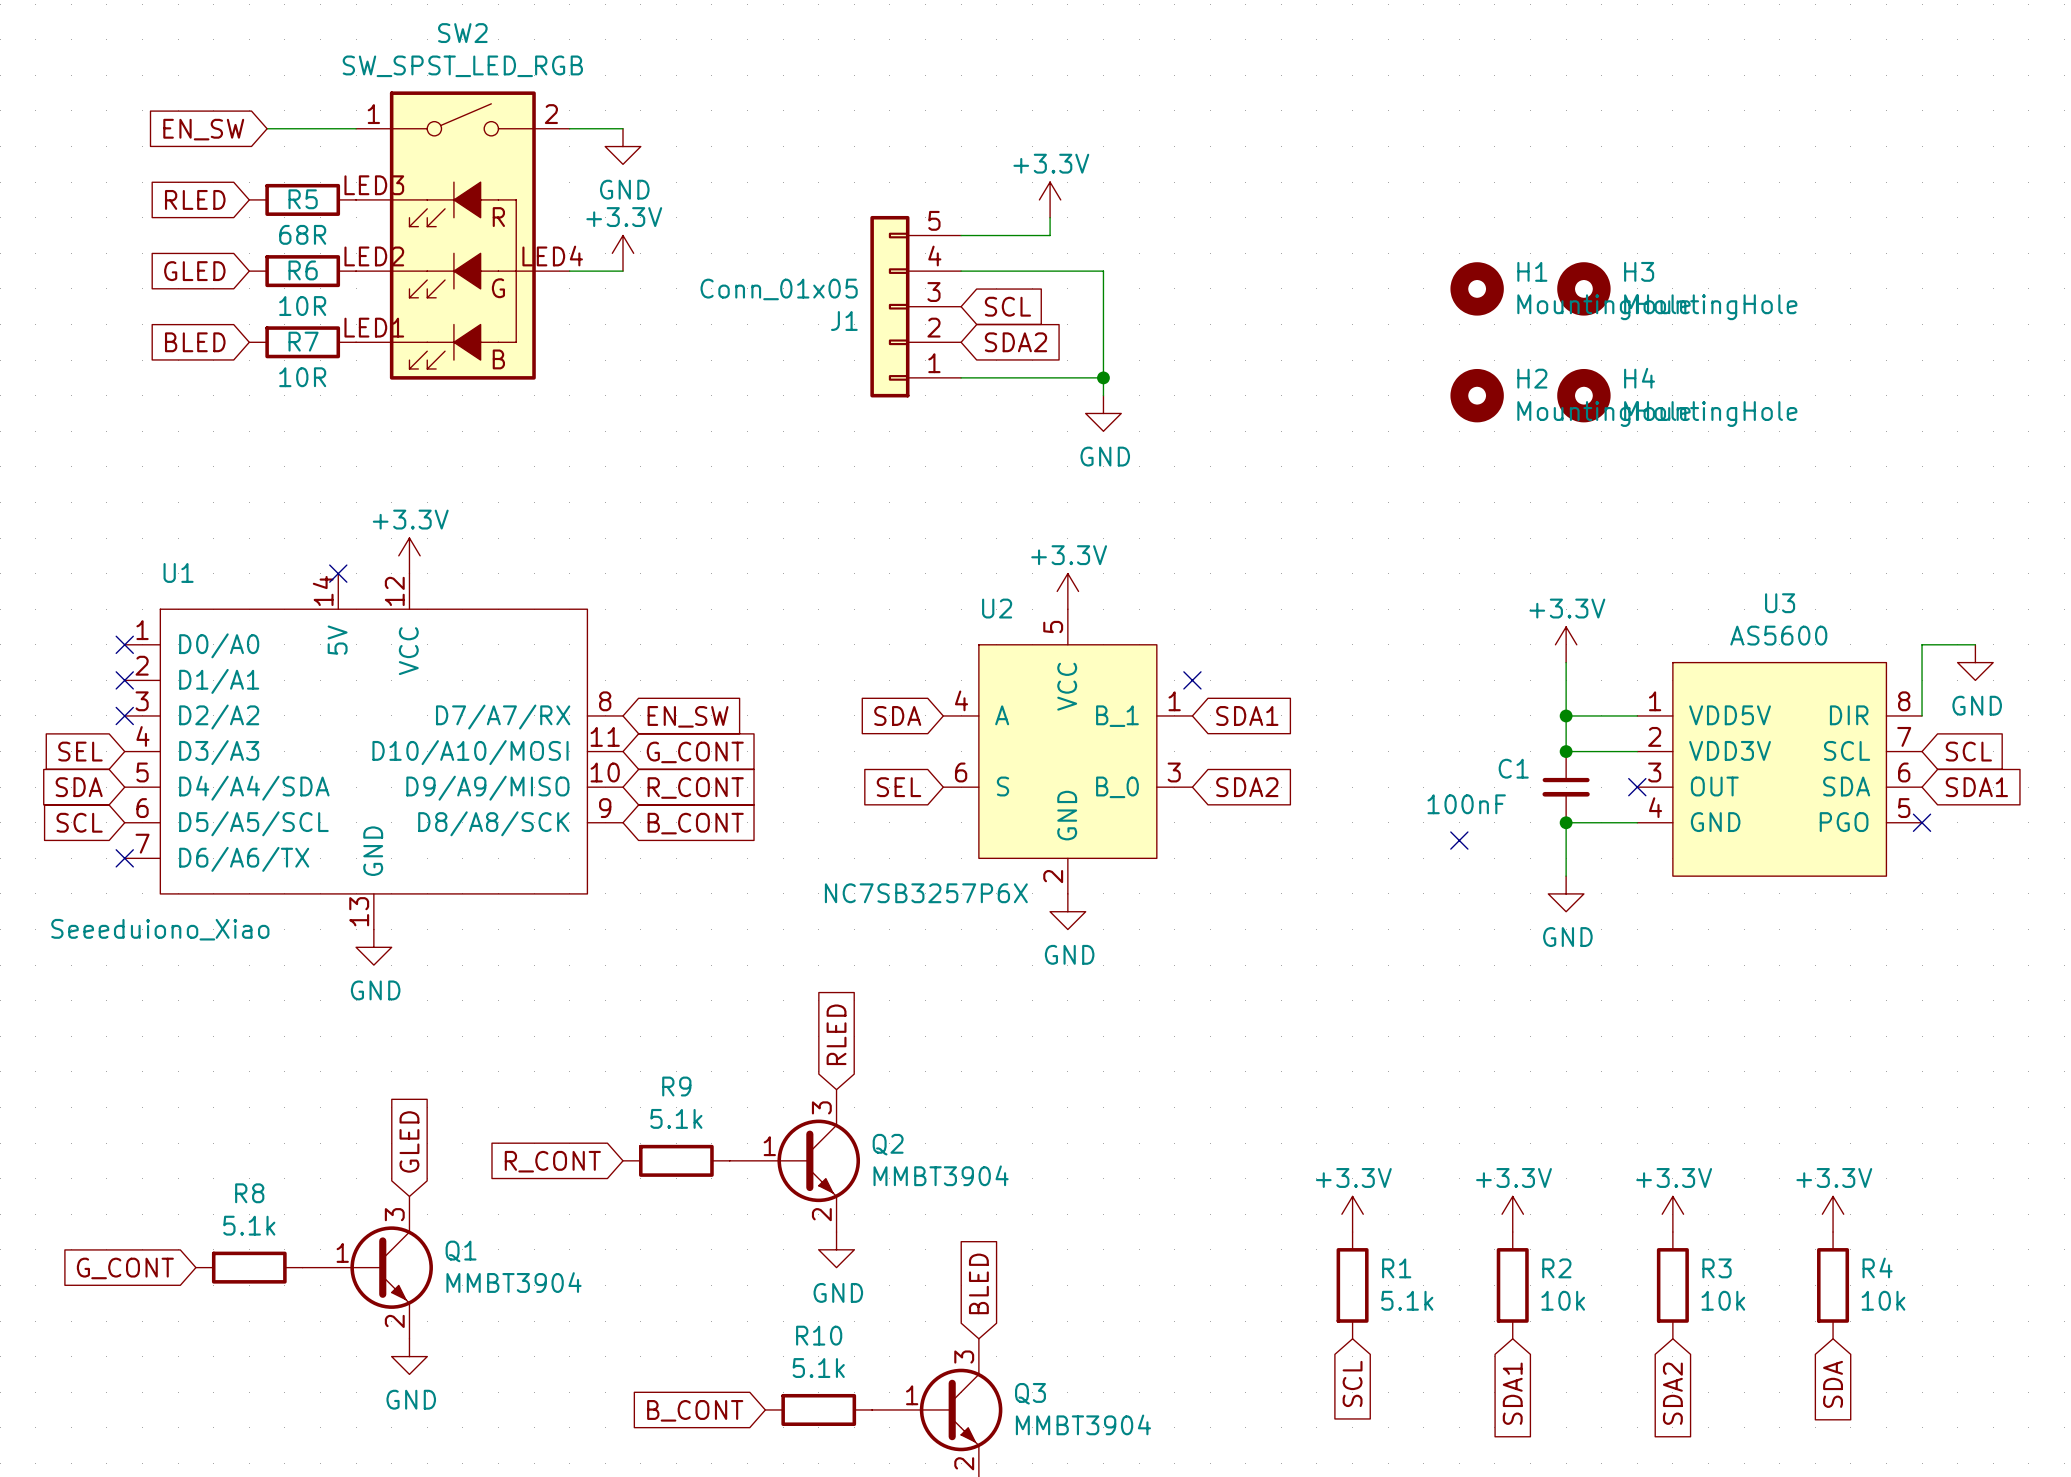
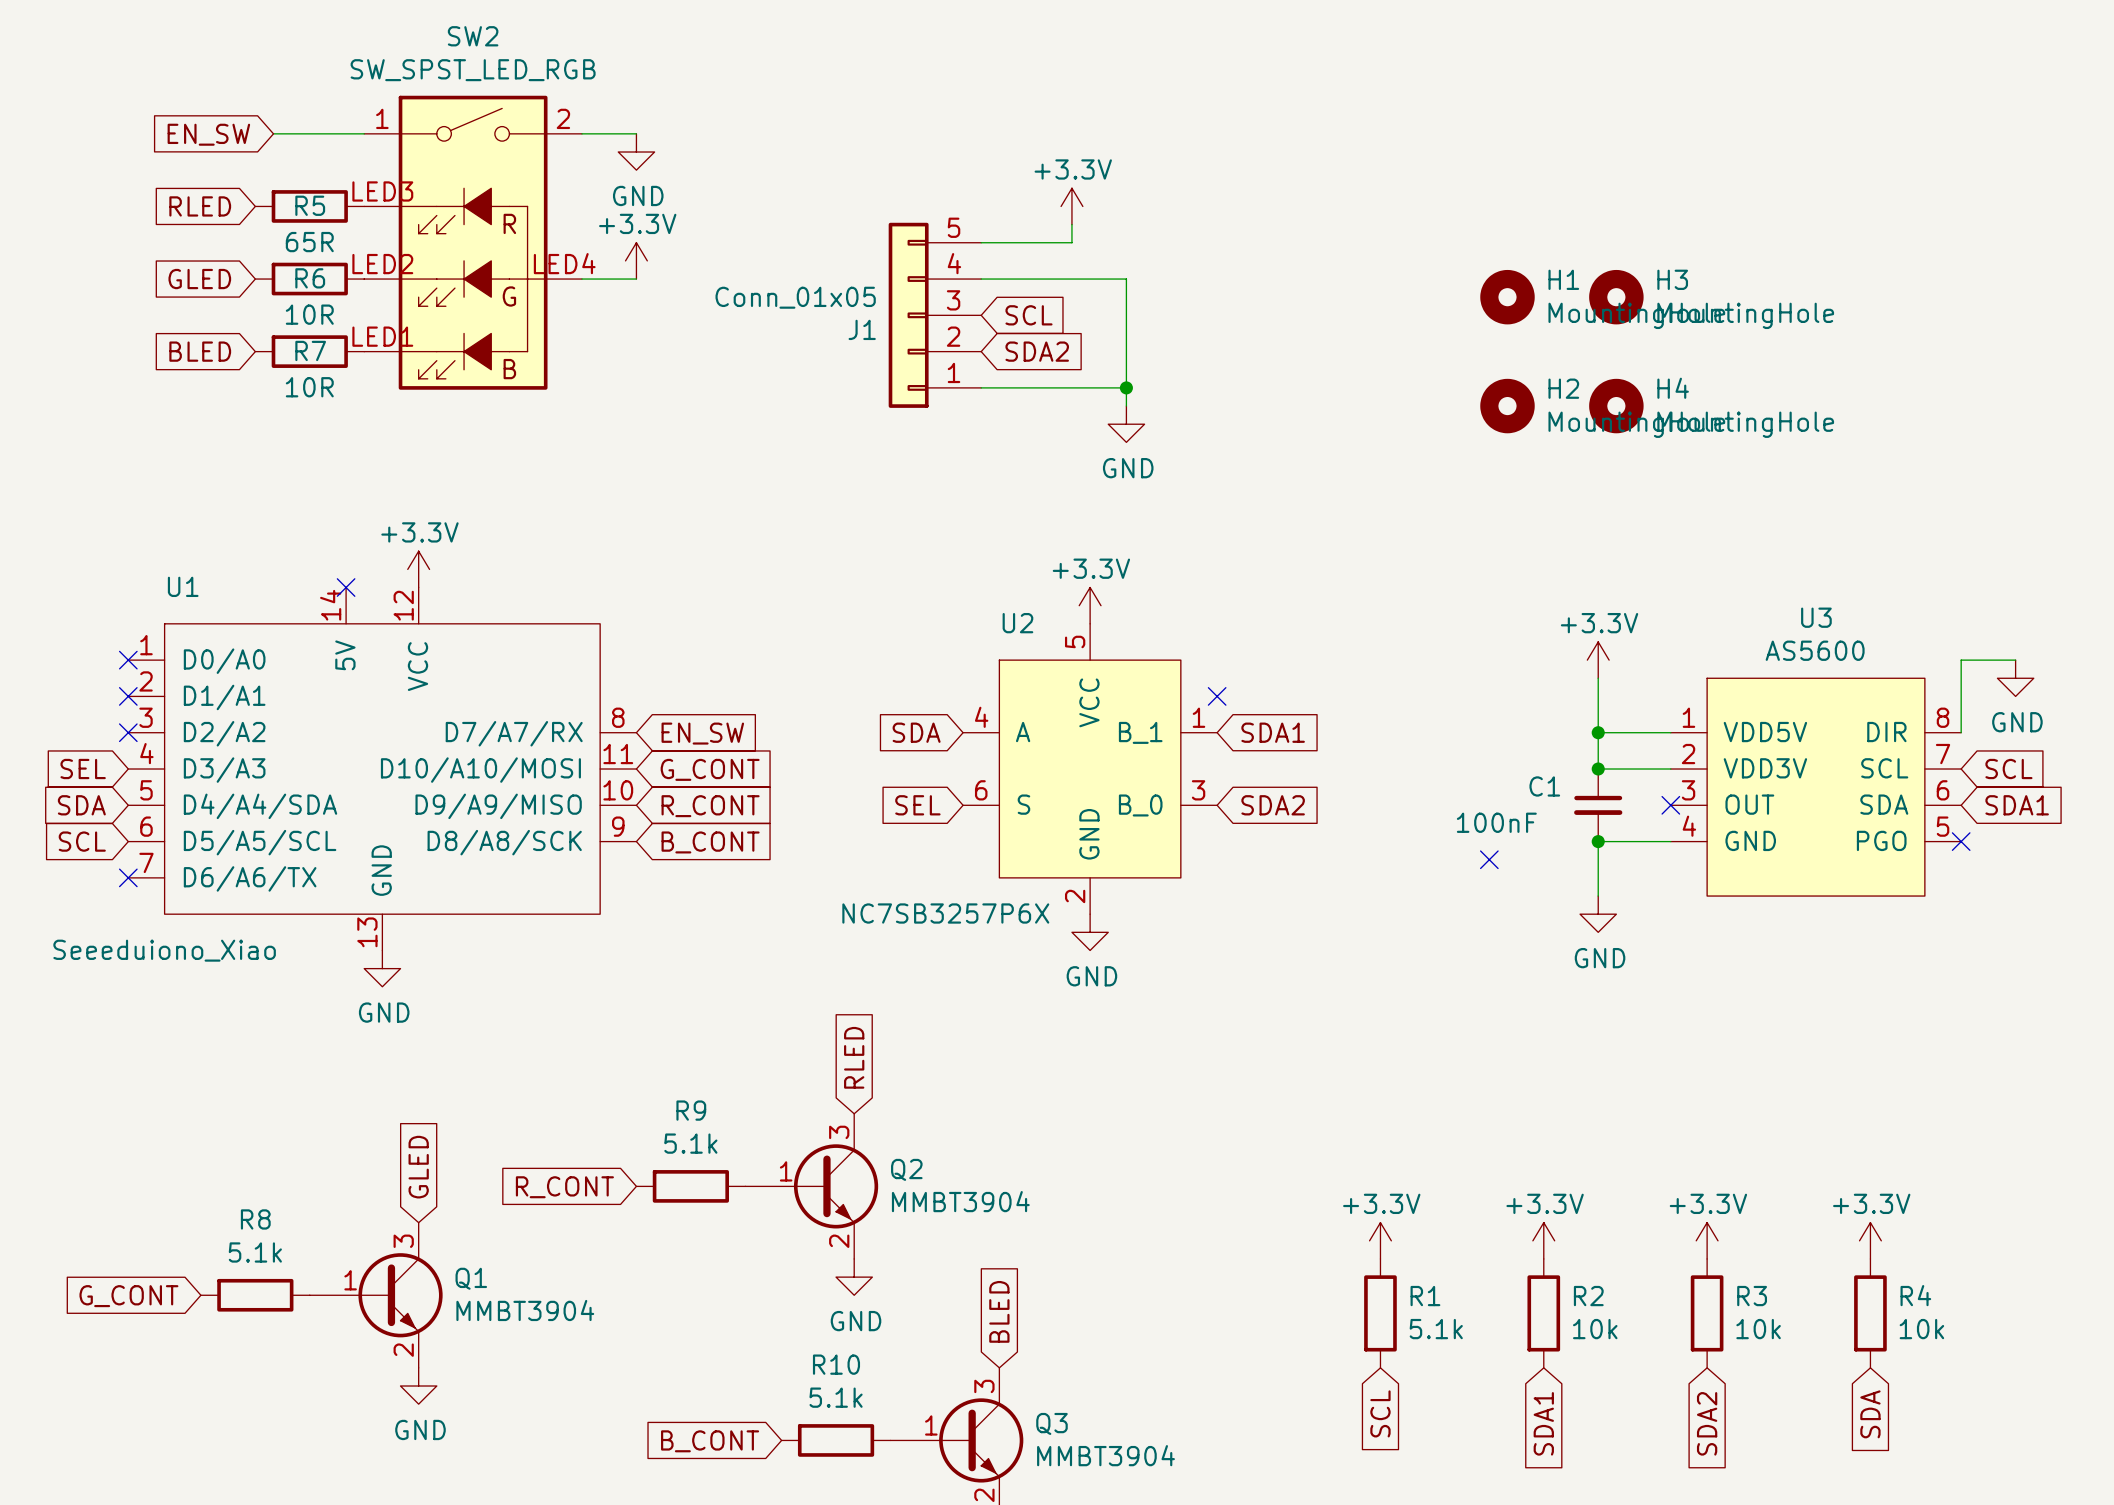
R5 value: 68R (302, 234) -> 65R (309, 242)

